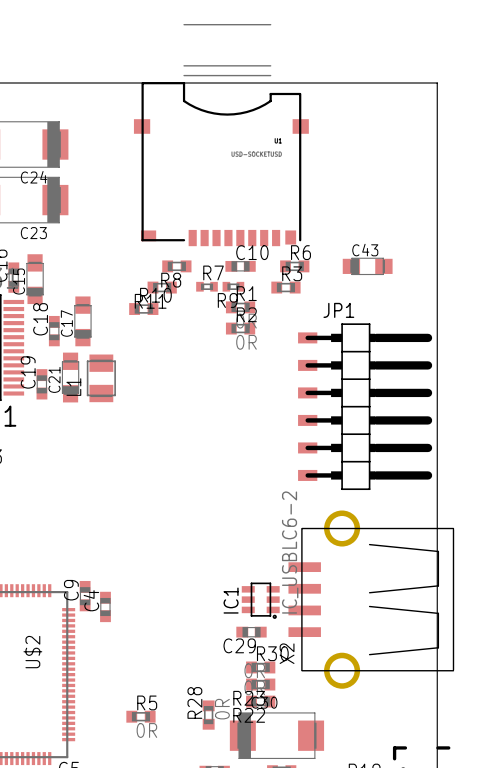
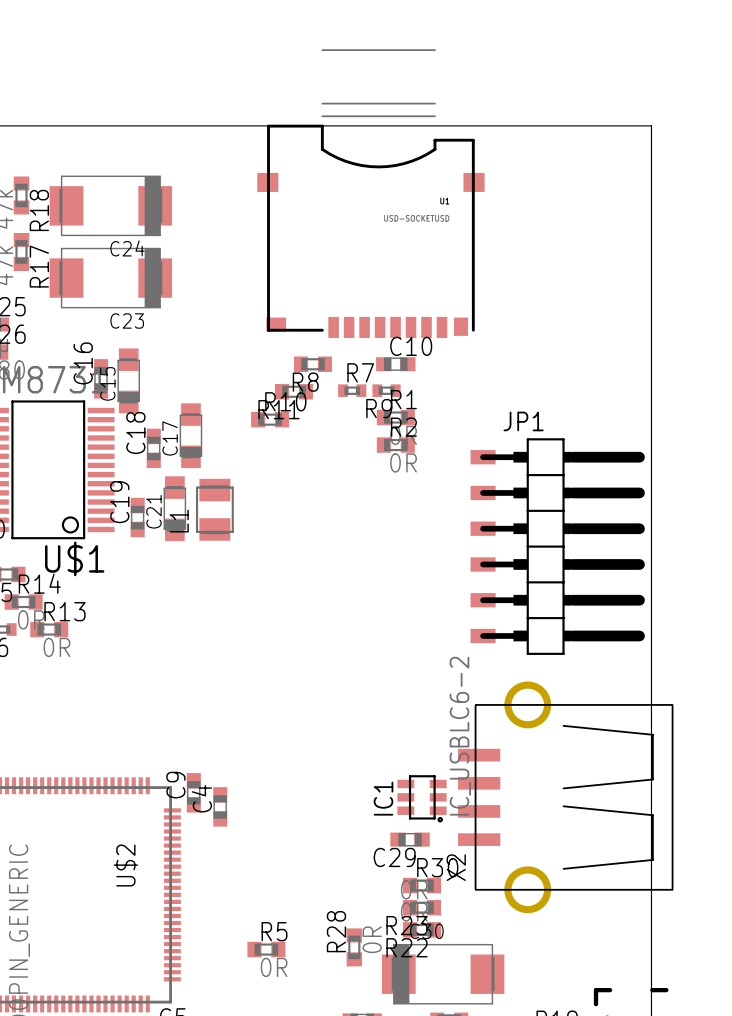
R6: (294, 266) -> none
C43: (367, 266) -> none
R3: (285, 287) -> none

